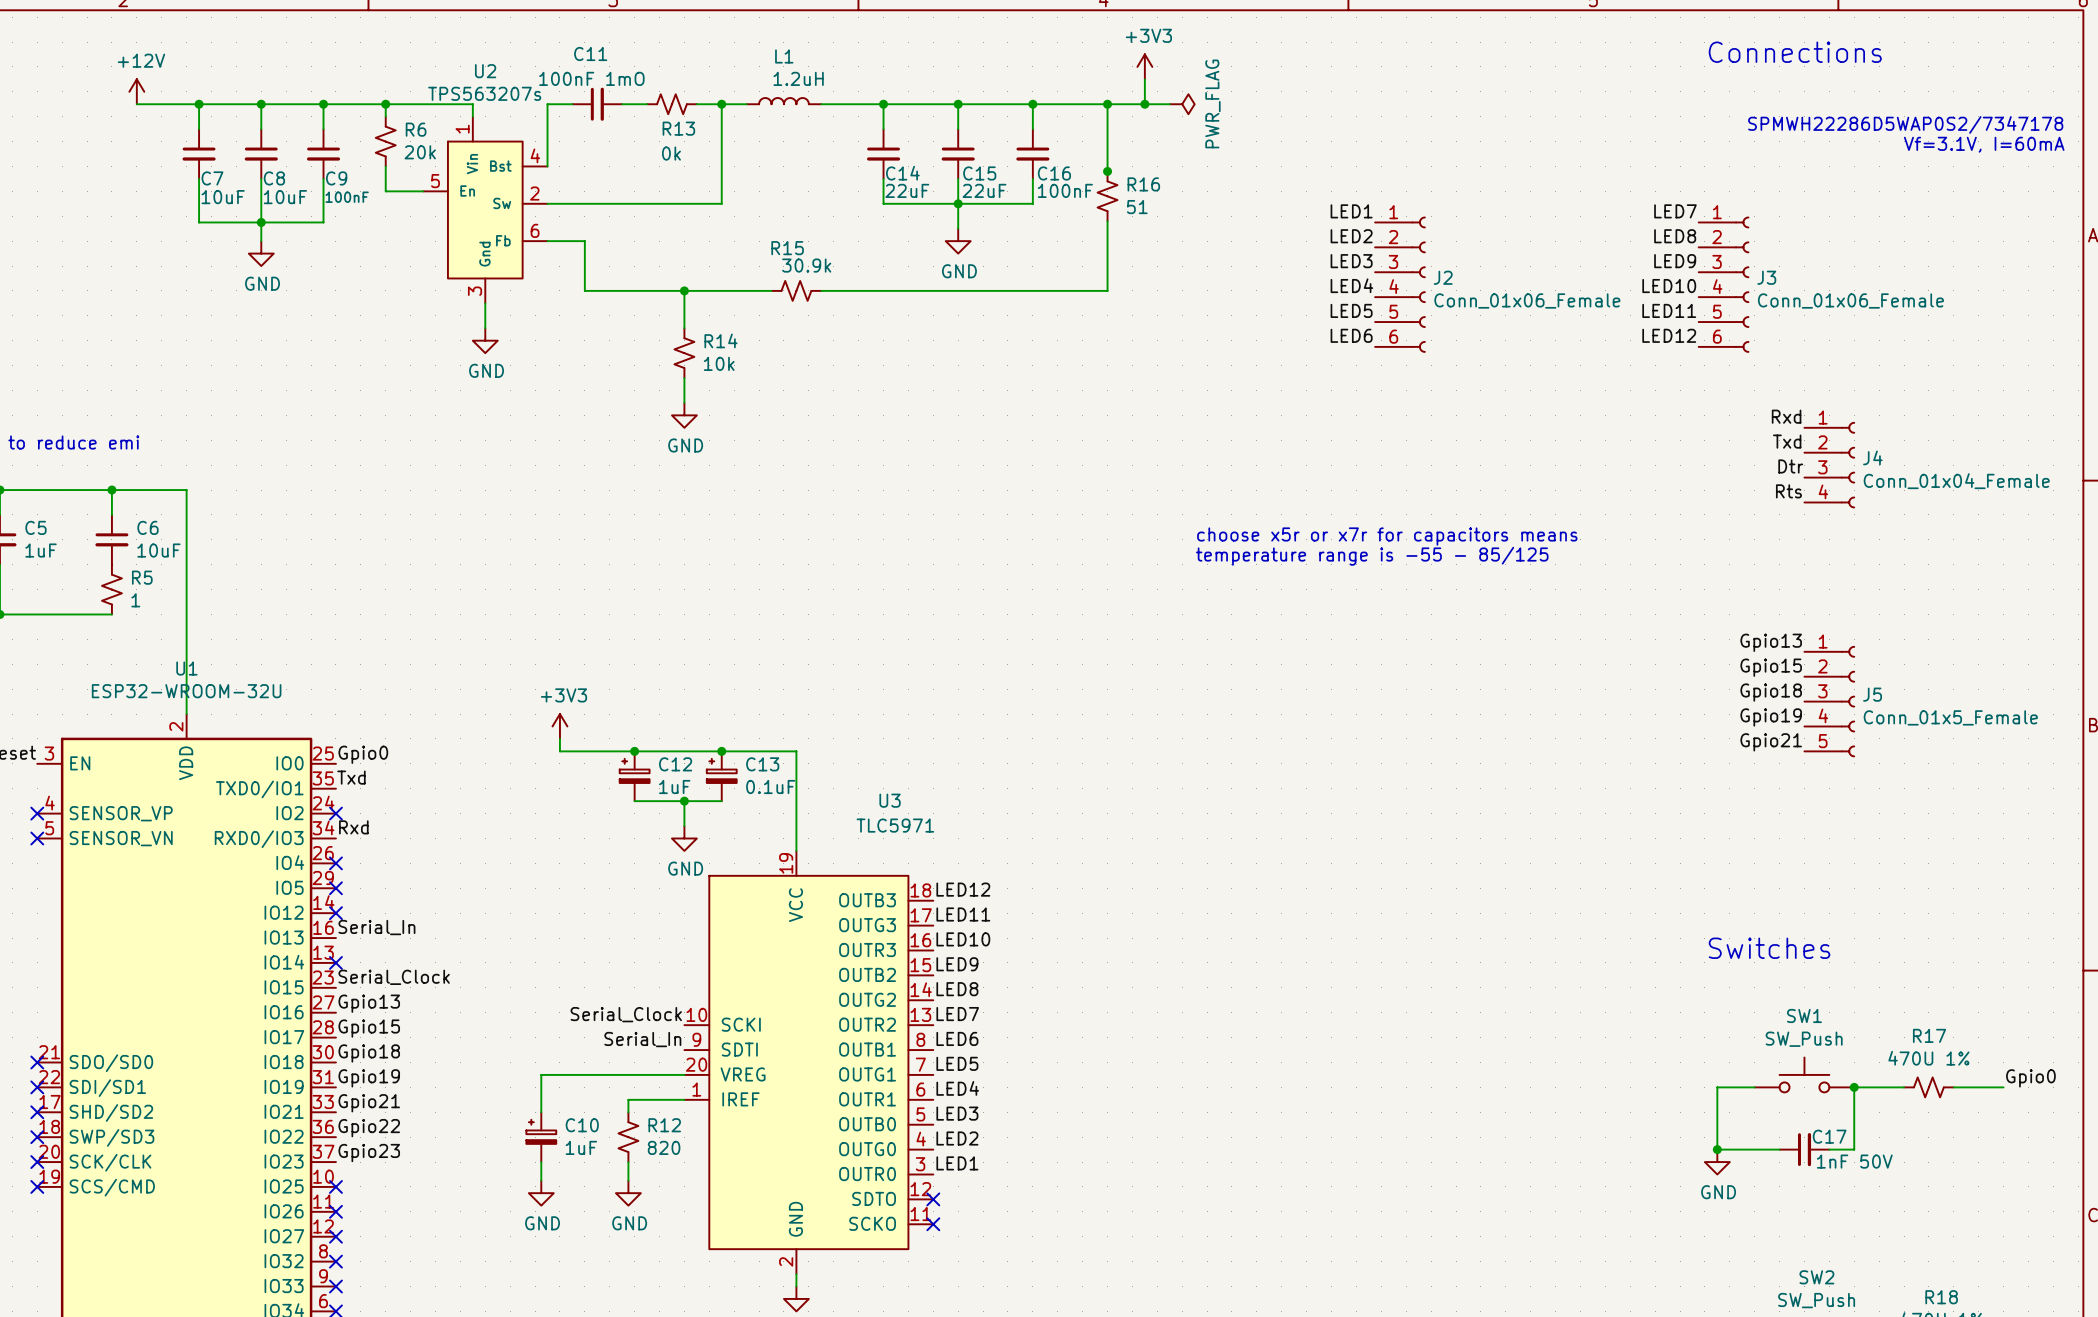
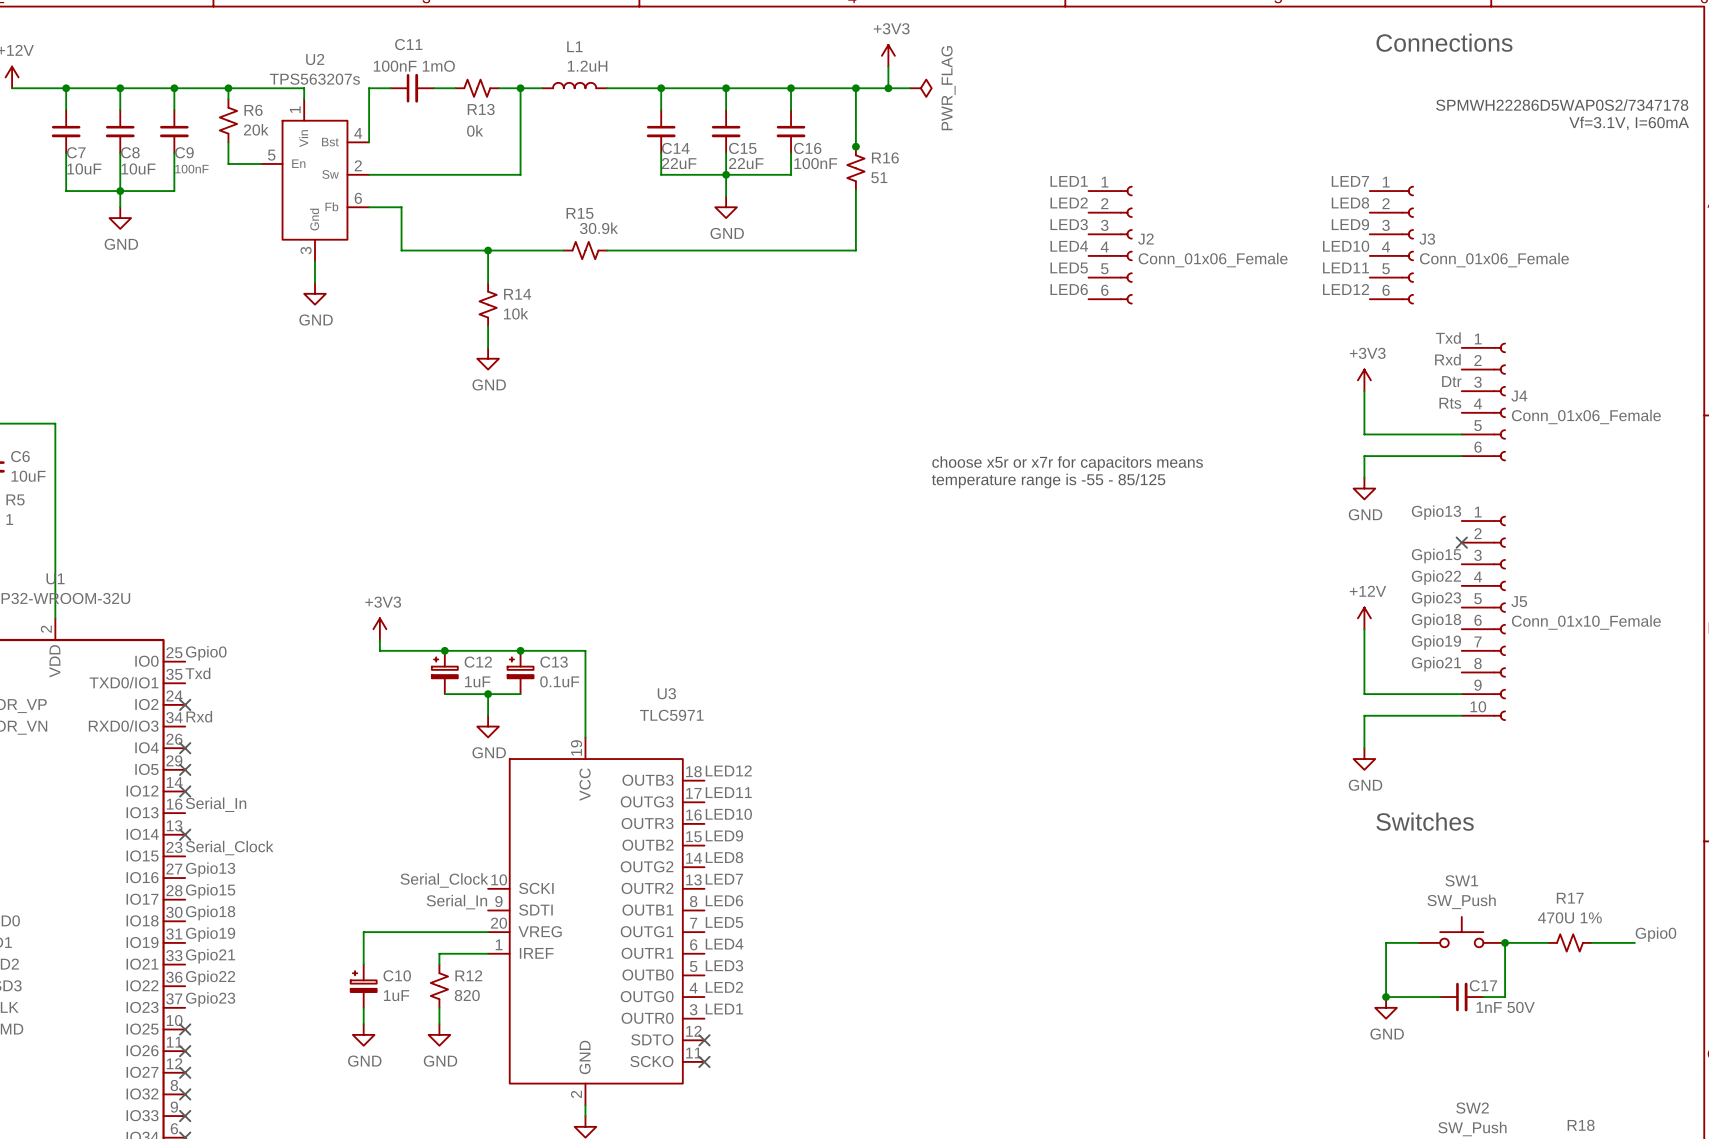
label: none -> Txd (1448, 338)
J4 symbol: [1804, 422, 1855, 509] -> [1461, 342, 1506, 462]
power symbol: none -> +3V3 (1364, 380)
label: Txd (1787, 441) -> Dtr (1451, 381)
wire: none -> (1364, 391) (1364, 434) (1461, 434)
label: Dtr (1790, 466) -> Rts (1450, 403)
J4 value: Conn_01x04_Female (1956, 481) -> Conn_01x06_Female (1586, 416)
label: Rts (1788, 491) -> none
wire: none -> (1461, 456) (1364, 456) (1364, 477)
power symbol: none -> GND (1364, 488)
label: none -> Gpio13 (1436, 512)
no-connect mark: none -> (1461, 542)
label: Gpio13 (1771, 642) -> Gpio15 (1436, 555)
J5 symbol: [1804, 646, 1855, 758] -> [1461, 516, 1506, 721]
label: Gpio15 (1771, 667) -> Gpio22 (1436, 577)
label: Gpio18 (1771, 692) -> Gpio23 (1436, 599)
power symbol: none -> +12V (1364, 618)
label: Gpio19 (1771, 717) -> Gpio18 (1436, 620)
J5 value: Conn_01x5_Female (1950, 717) -> Conn_01x10_Female (1586, 622)
wire: none -> (1364, 629) (1364, 694) (1461, 694)
label: Gpio21 (1771, 742) -> Gpio19 (1436, 642)
label: none -> Gpio21 (1436, 664)
wire: none -> (1461, 715) (1364, 715) (1364, 748)
power symbol: none -> GND (1364, 759)

